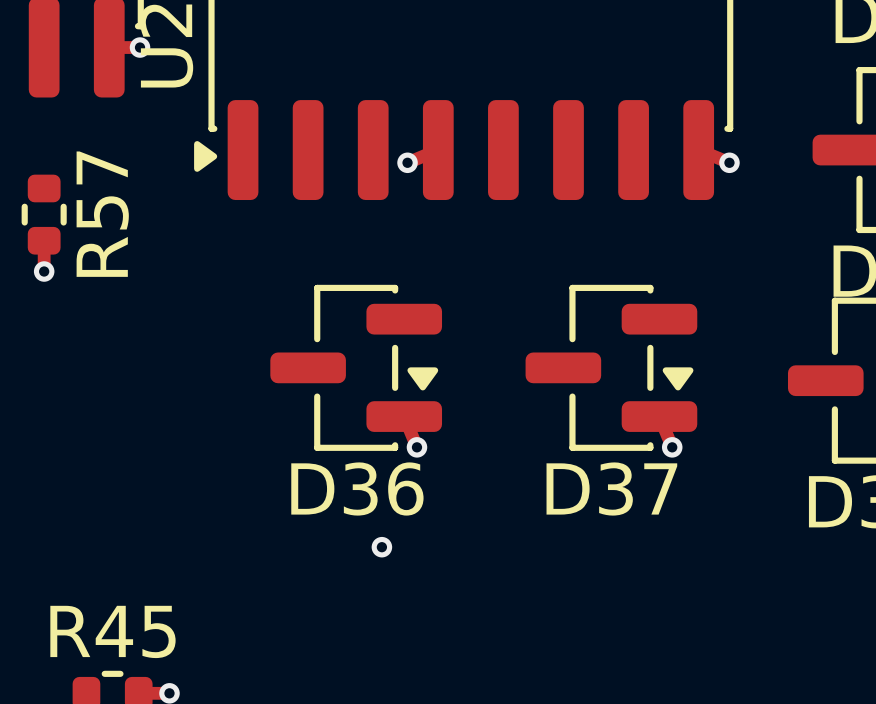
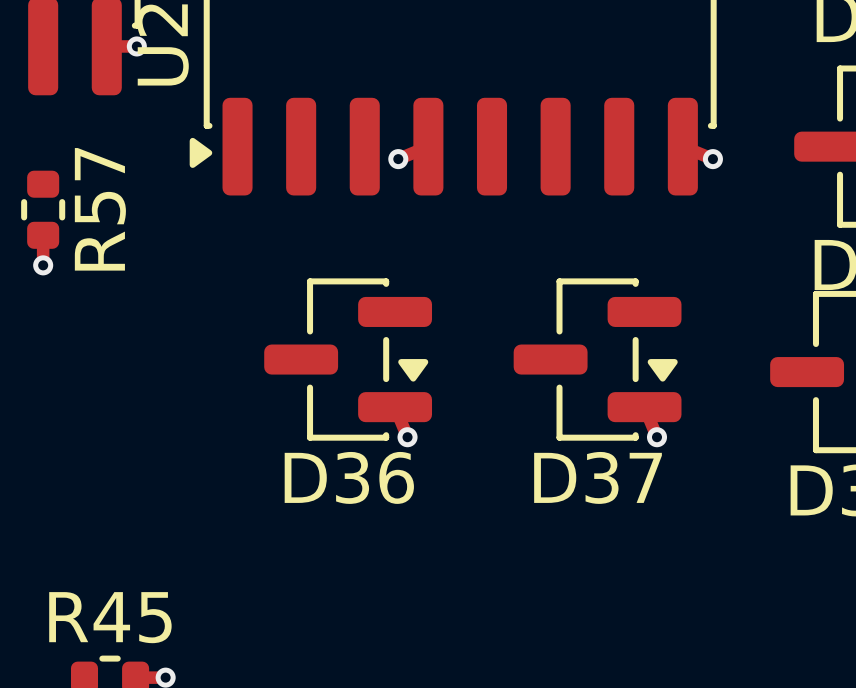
via: (381, 547) -> none

